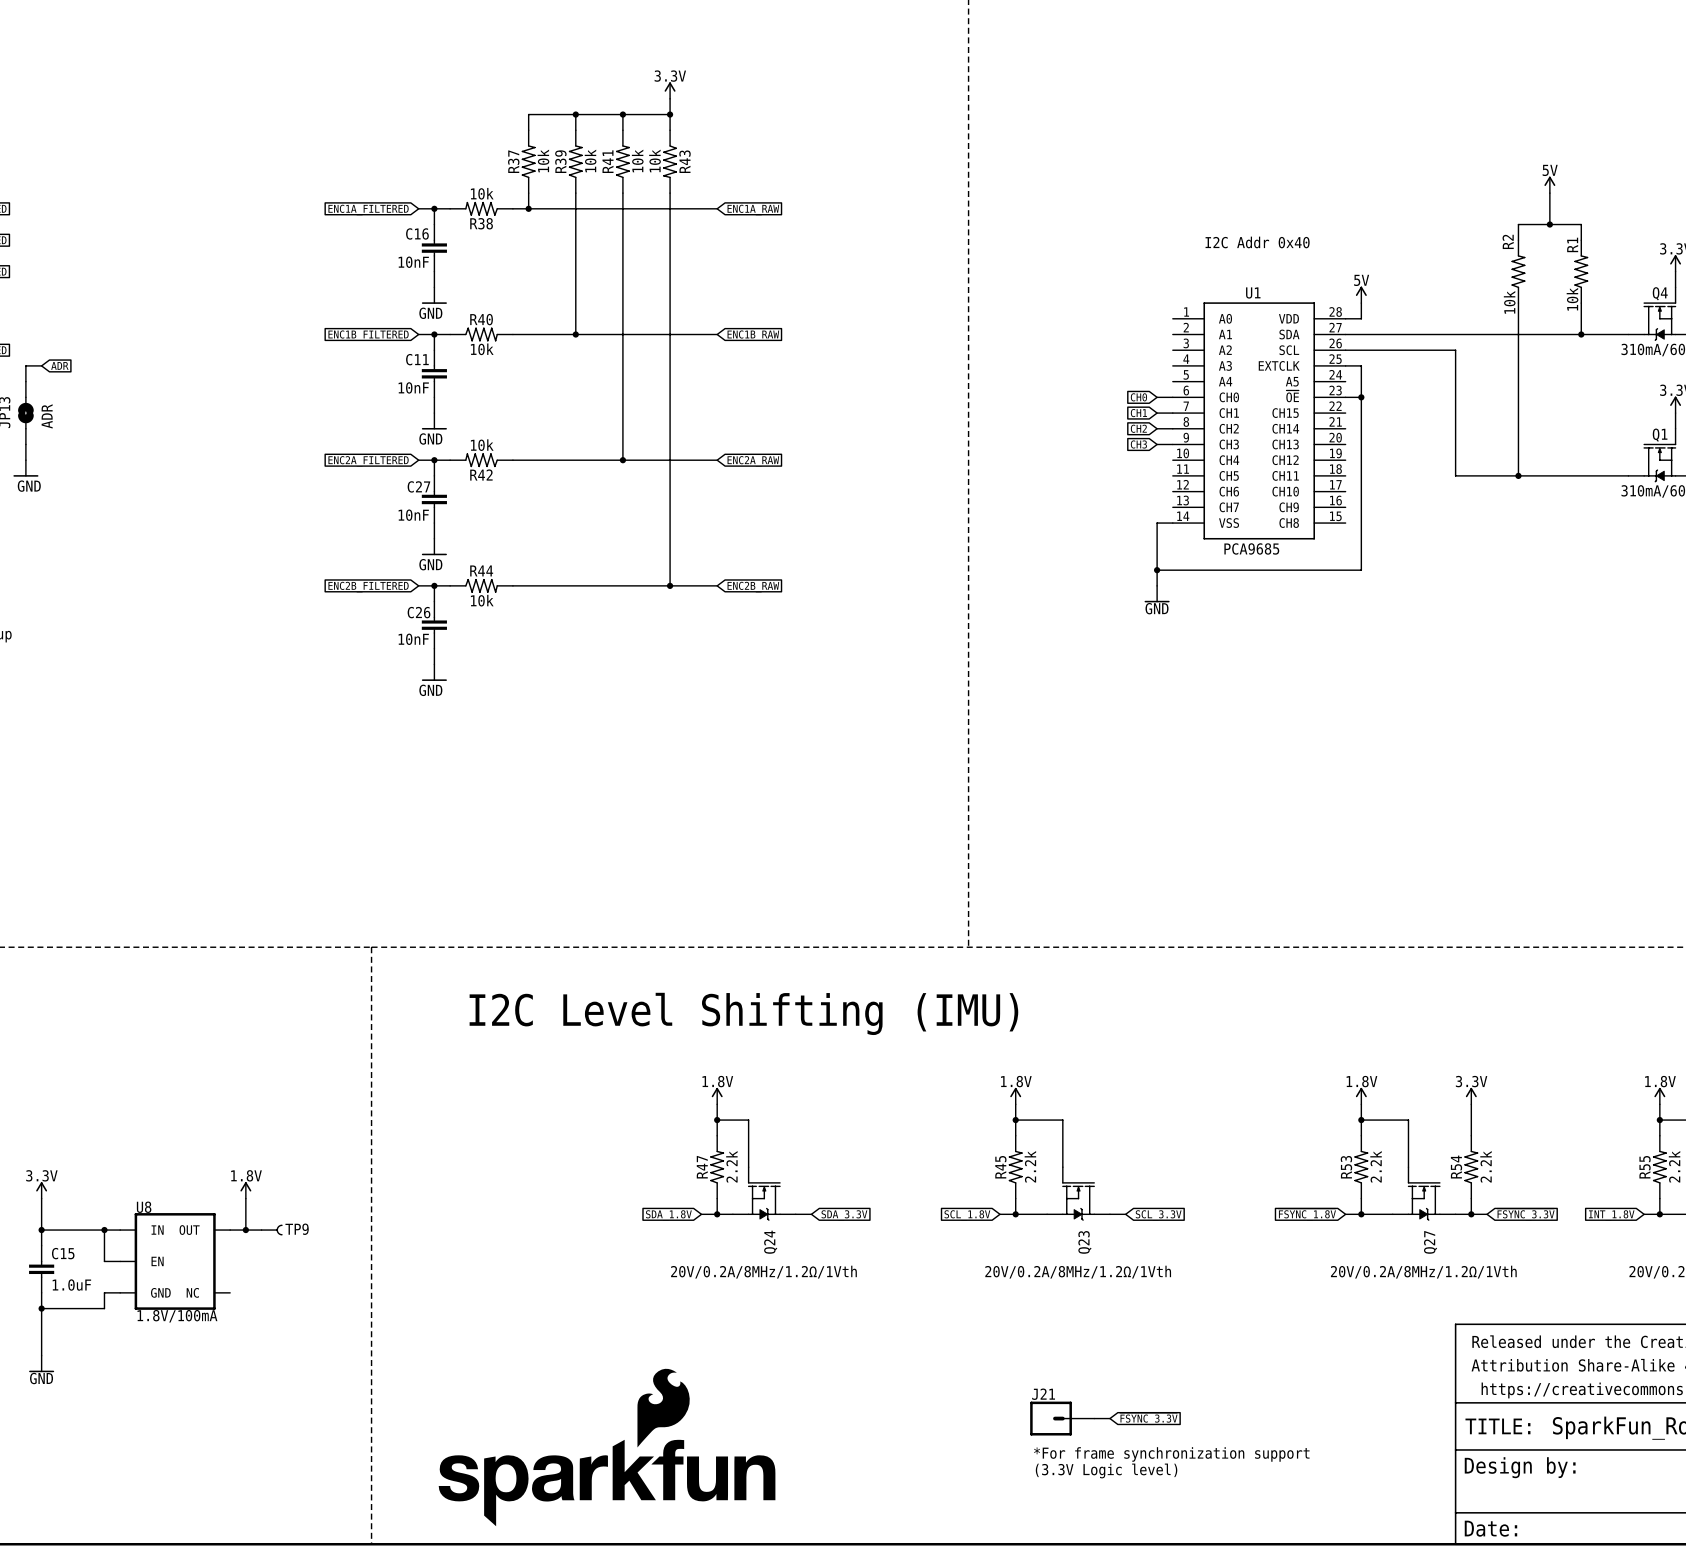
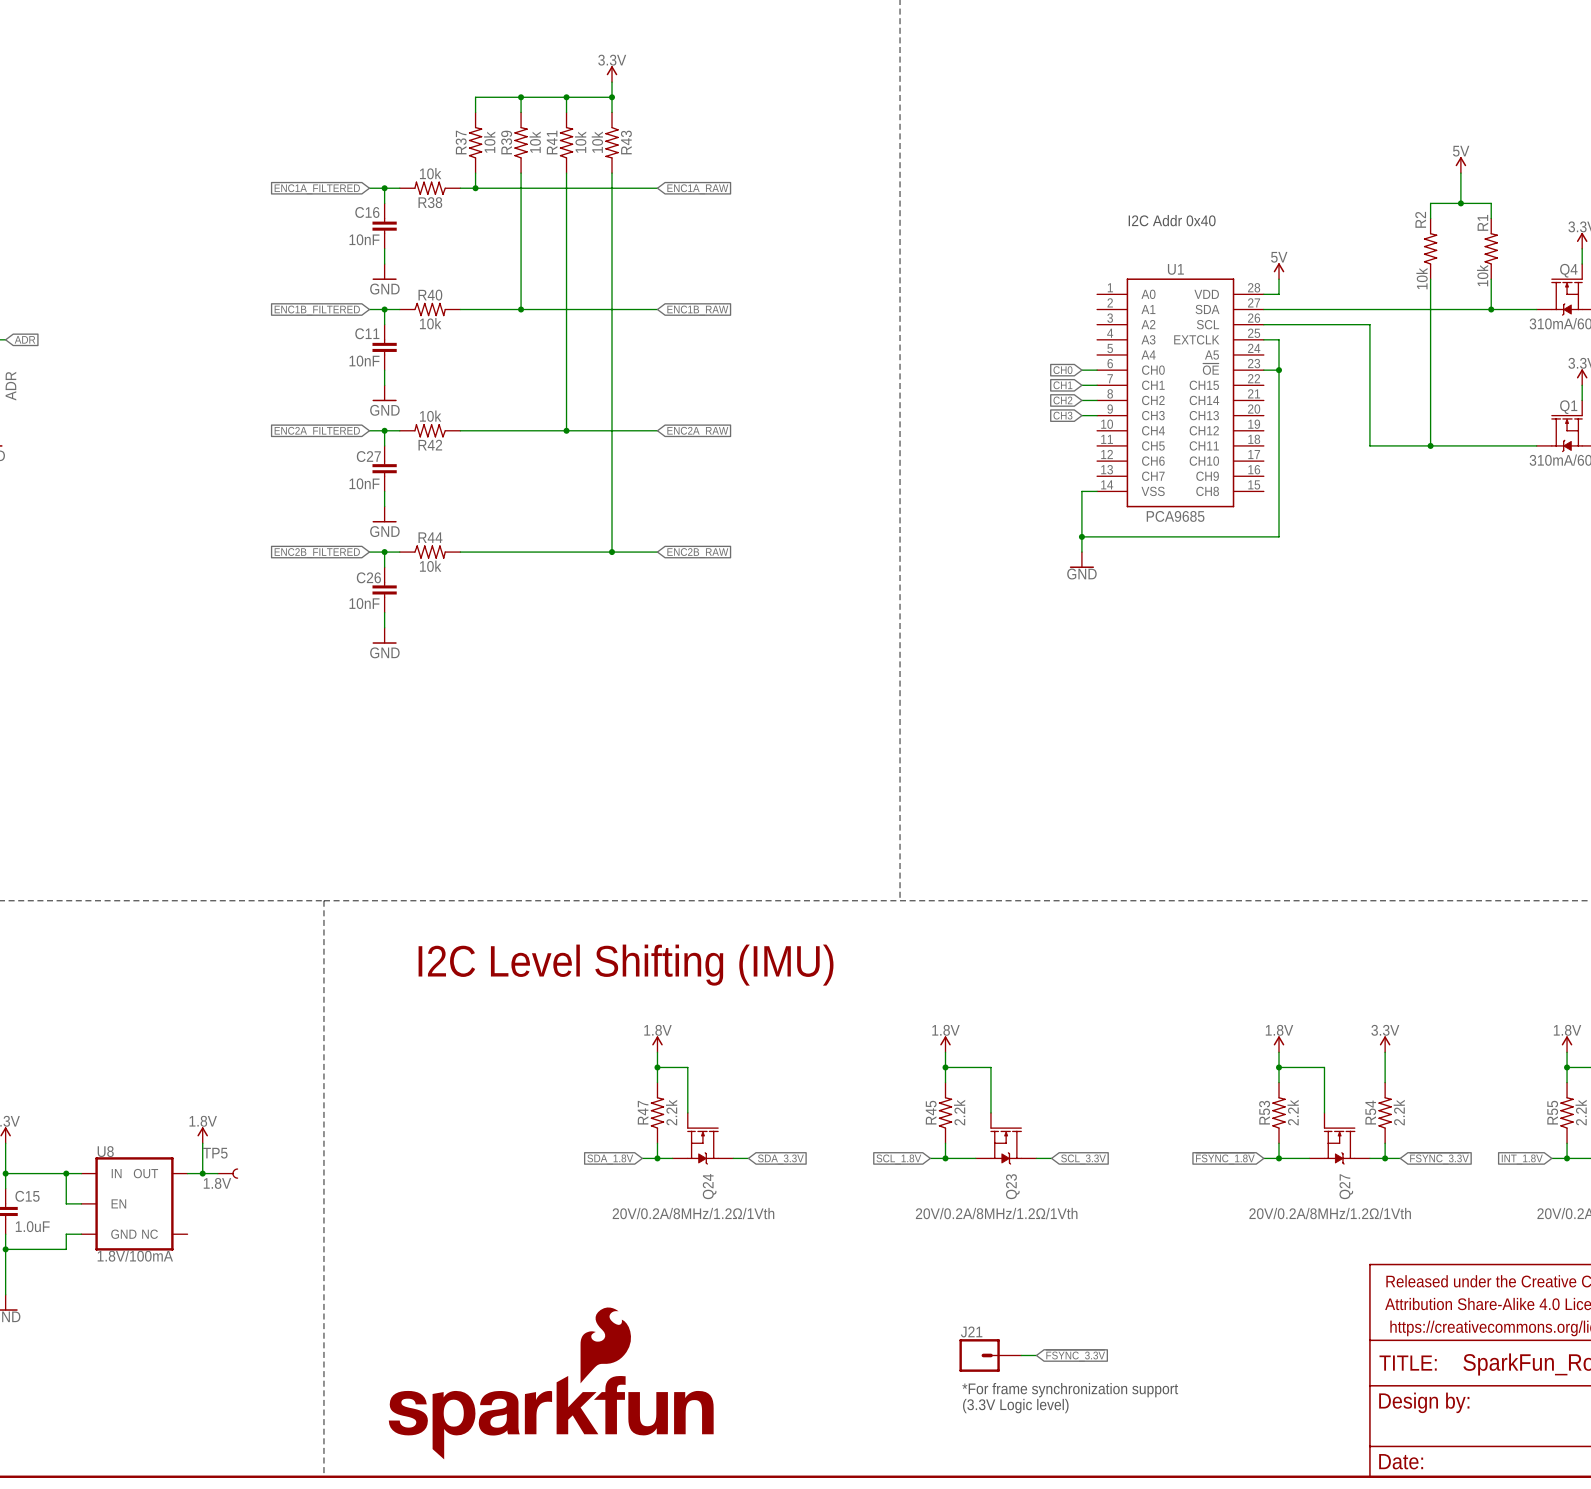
TP9 name: TP9 (297, 1229) -> TP5 (215, 1153)
TP9 value: none -> 1.8V (217, 1183)

